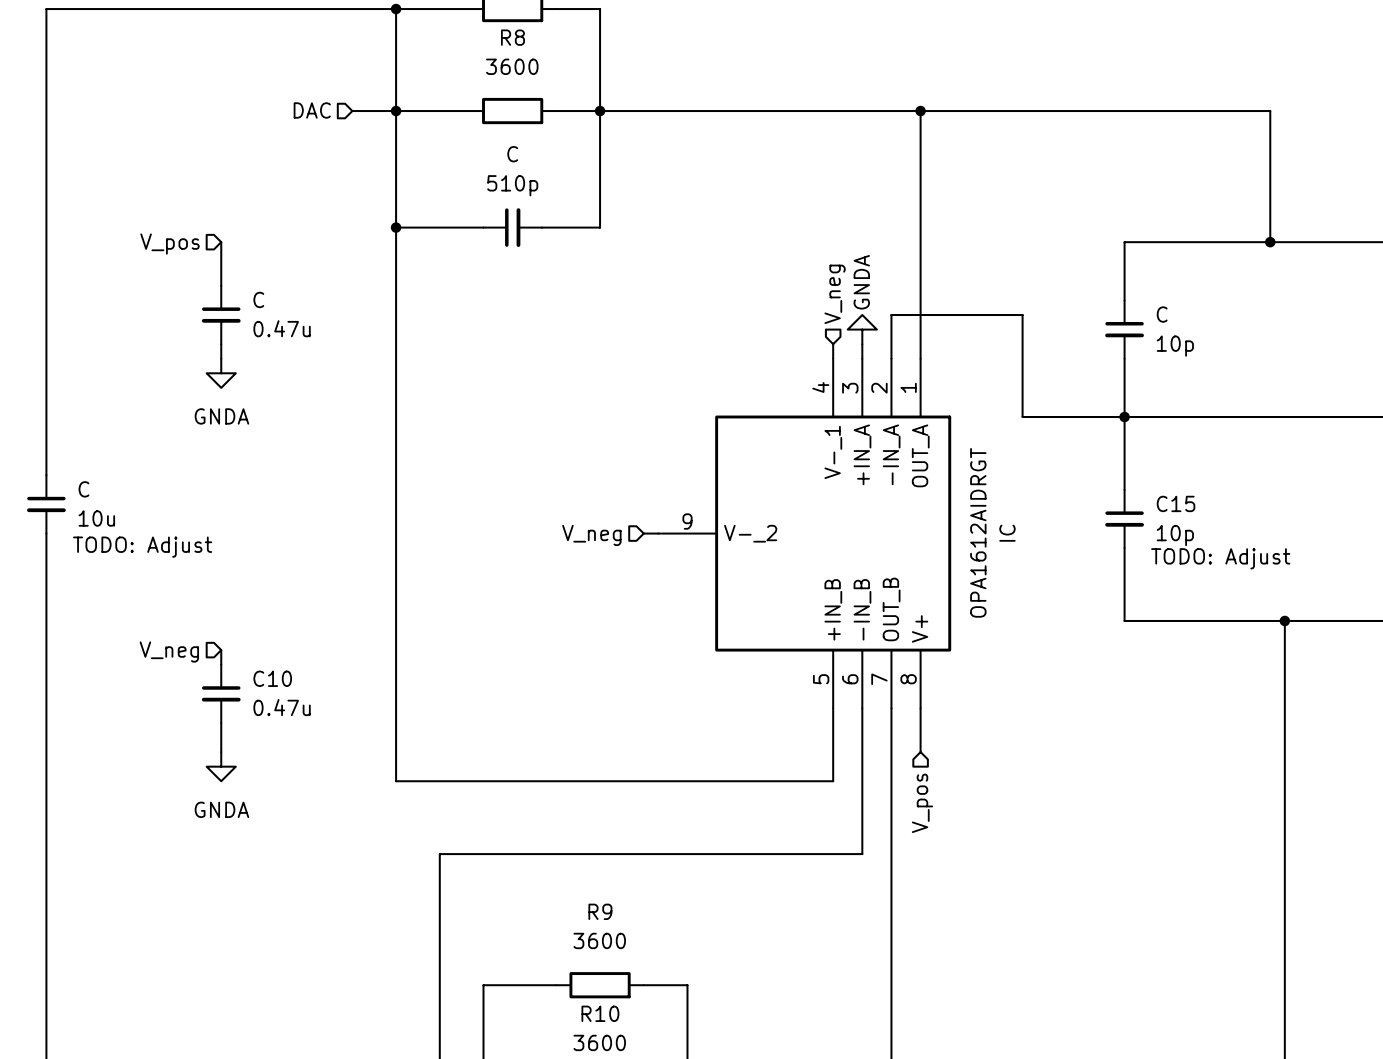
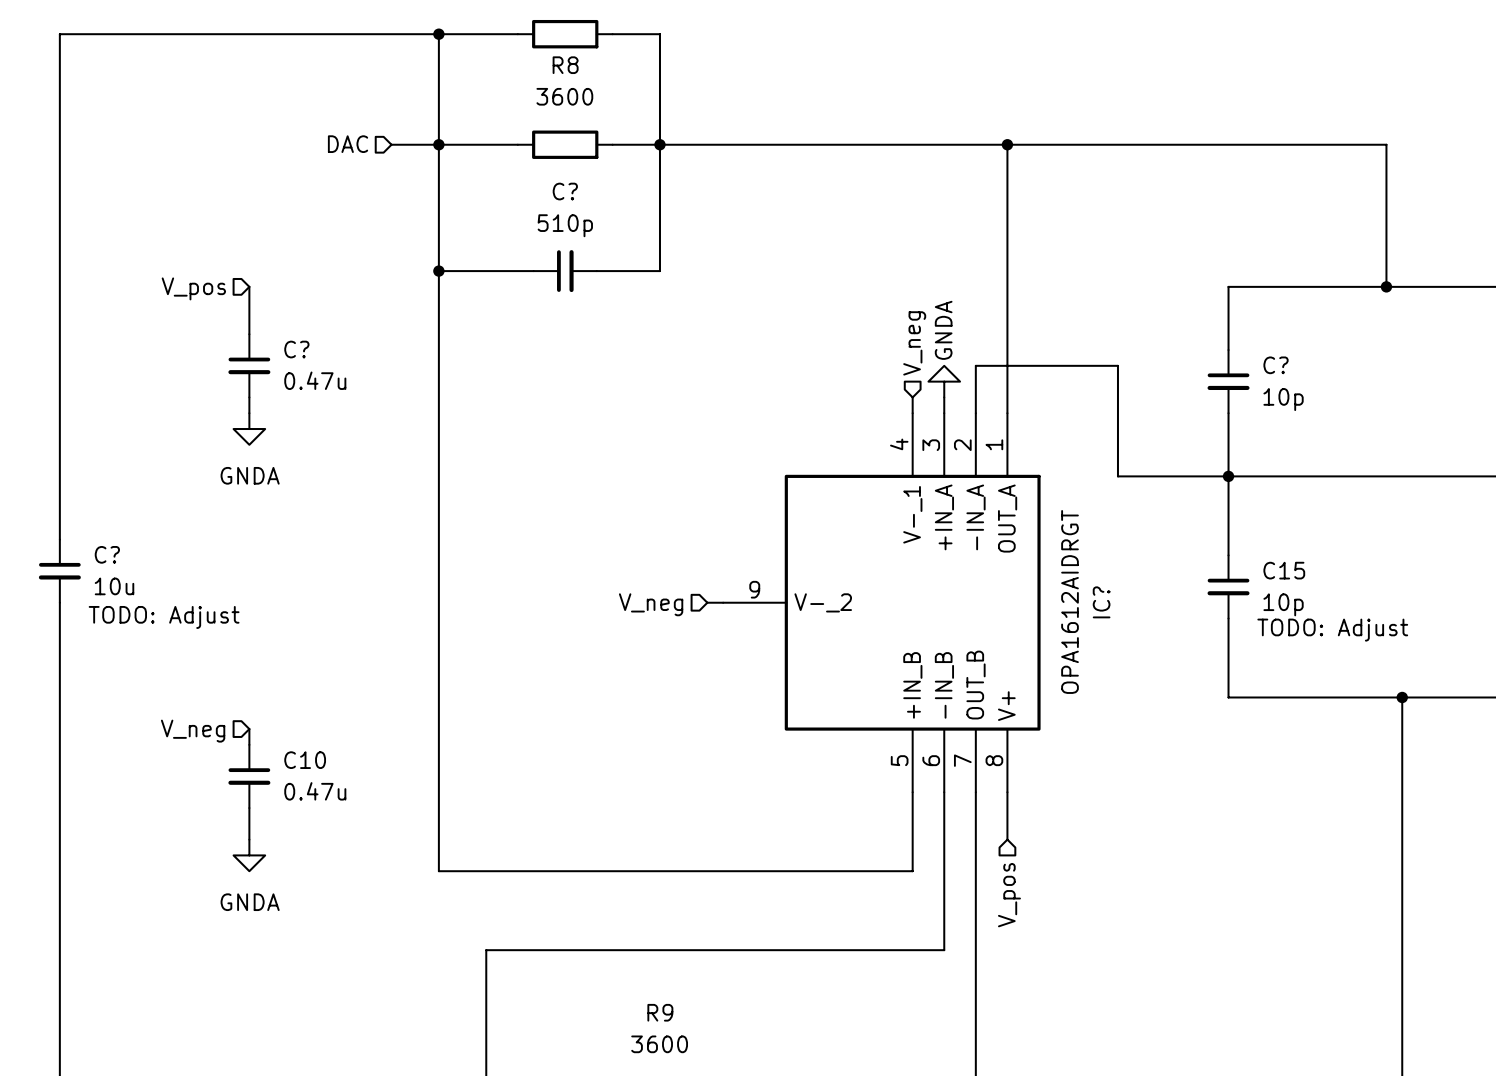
C name: C (512, 154) -> C? (565, 191)
C name: C (258, 299) -> C? (296, 349)
C name: C (1162, 314) -> C? (1276, 365)
C name: C (83, 489) -> C? (107, 554)
IC name: IC (1007, 533) -> IC? (1101, 602)

